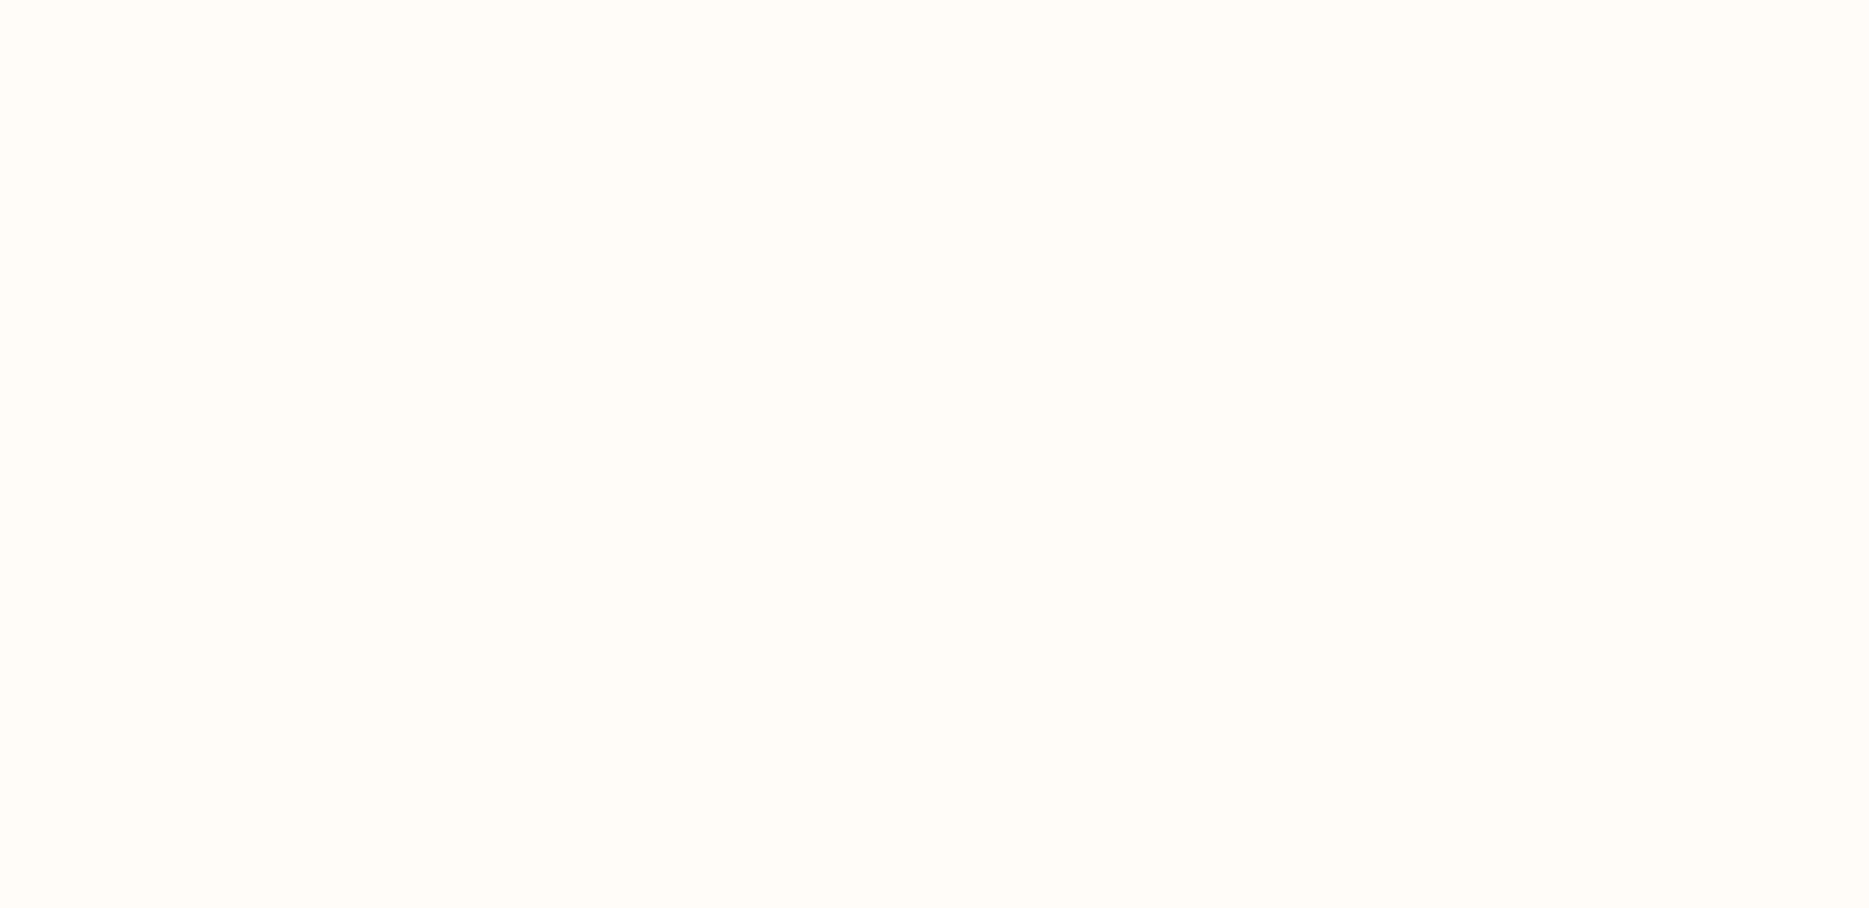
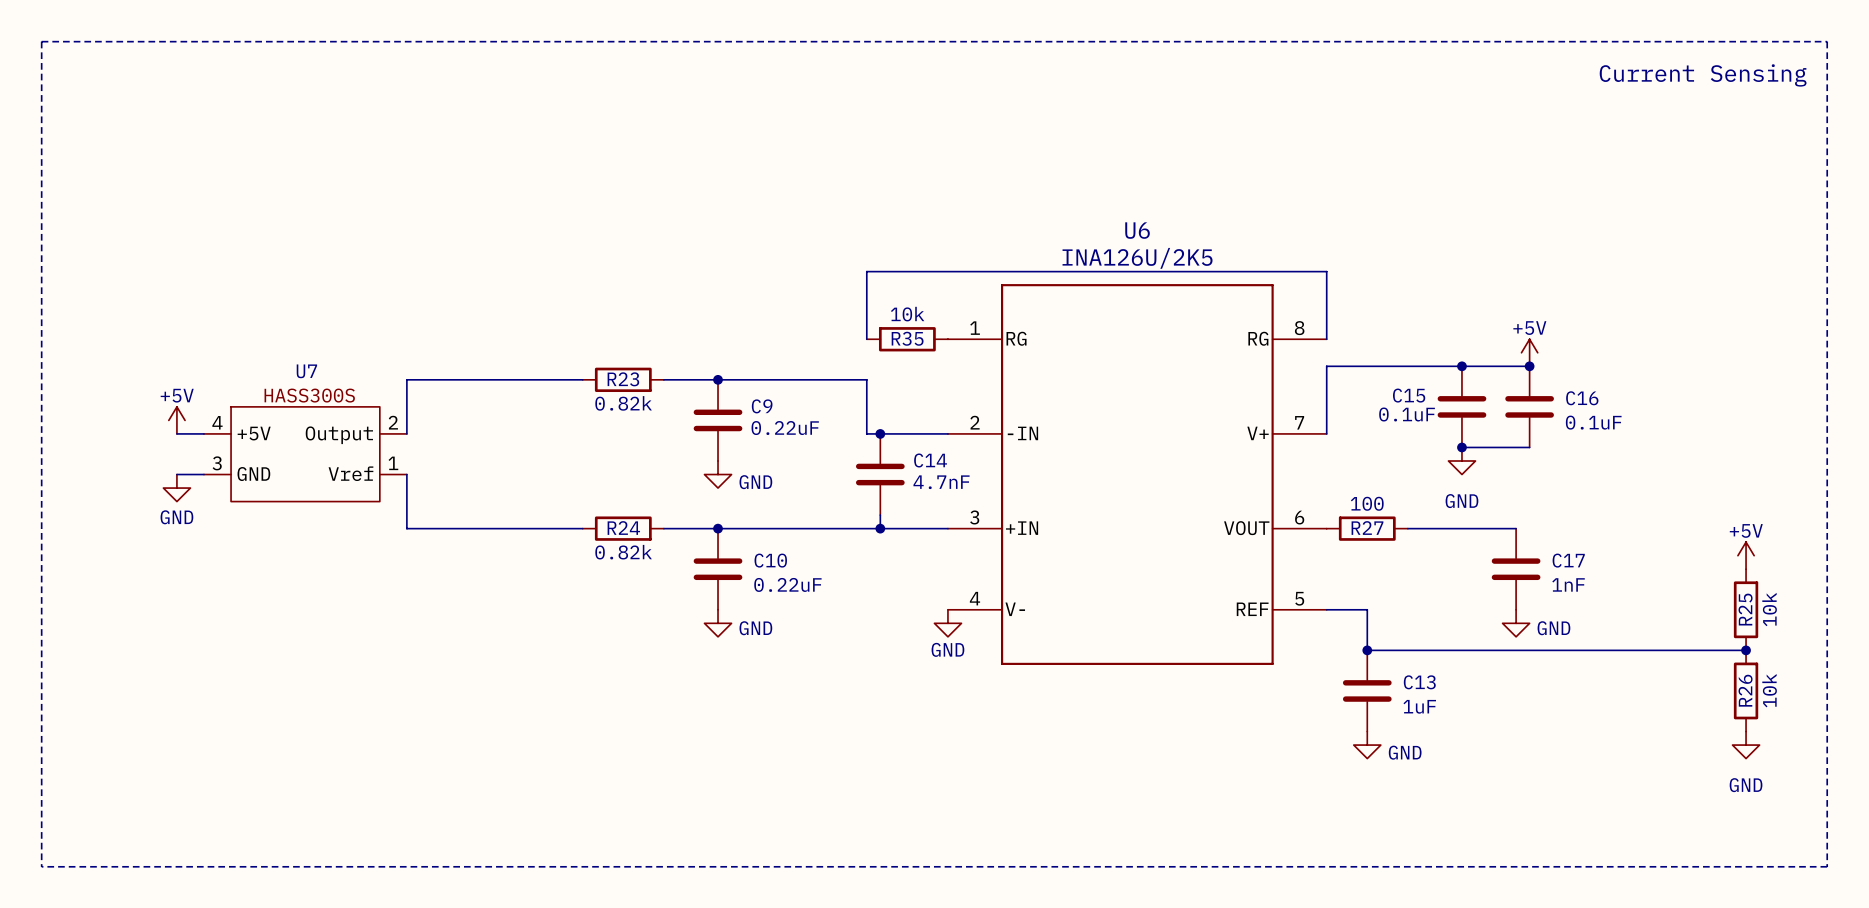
line: none -> (41, 41) (1827, 41) (1827, 866) (41, 866) (41, 41)
text: none -> Current Sensing (1703, 75)
wire: none -> (866, 339) (866, 271) (1326, 271) (1326, 339)
R35: none -> 10k (907, 339)
power symbol: none -> +5V (1529, 352)
junction: none -> (1461, 366)
wire: none -> (1529, 366) (1326, 366) (1326, 433)
junction: none -> (1529, 366)
wire: none -> (582, 379) (406, 379) (406, 433)
R23: none -> 0.82k (623, 379)
wire: none -> (663, 379) (866, 379) (866, 433) (947, 433)
junction: none -> (718, 379)
C15: none -> 0.1uF (1461, 406)
C16: none -> 0.1uF (1529, 406)
power symbol: none -> +5V (176, 420)
C9: none -> 0.22uF (718, 420)
wire: none -> (176, 433) (203, 433)
junction: none -> (880, 433)
wire: none -> (1461, 447) (1529, 447)
junction: none -> (1461, 447)
U7: none -> (305, 454)
power symbol: none -> GND (1461, 461)
wire: none -> (176, 474) (203, 474)
wire: none -> (406, 474) (406, 528) (582, 528)
power symbol: none -> GND (718, 474)
C14: none -> 4.7nF (880, 474)
U6: none -> INA126U/2K5 (1137, 474)
power symbol: none -> GND (176, 488)
wire: none -> (880, 515) (880, 528)
R24: none -> 0.82k (623, 528)
wire: none -> (663, 528) (947, 528)
junction: none -> (718, 528)
junction: none -> (880, 528)
R27: none -> 100 (1367, 528)
wire: none -> (1407, 528) (1516, 528)
power symbol: none -> +5V (1746, 555)
C10: none -> 0.22uF (718, 569)
C17: none -> 1nF (1516, 569)
wire: none -> (1326, 609) (1367, 609) (1367, 650) (1746, 650)
R25: none -> 10k (1746, 609)
power symbol: none -> GND (718, 623)
power symbol: none -> GND (947, 623)
power symbol: none -> GND (1516, 623)
junction: none -> (1367, 650)
junction: none -> (1746, 650)
C13: none -> 1uF (1367, 690)
R26: none -> 10k (1746, 690)
power symbol: none -> GND (1367, 745)
power symbol: none -> GND (1746, 745)

